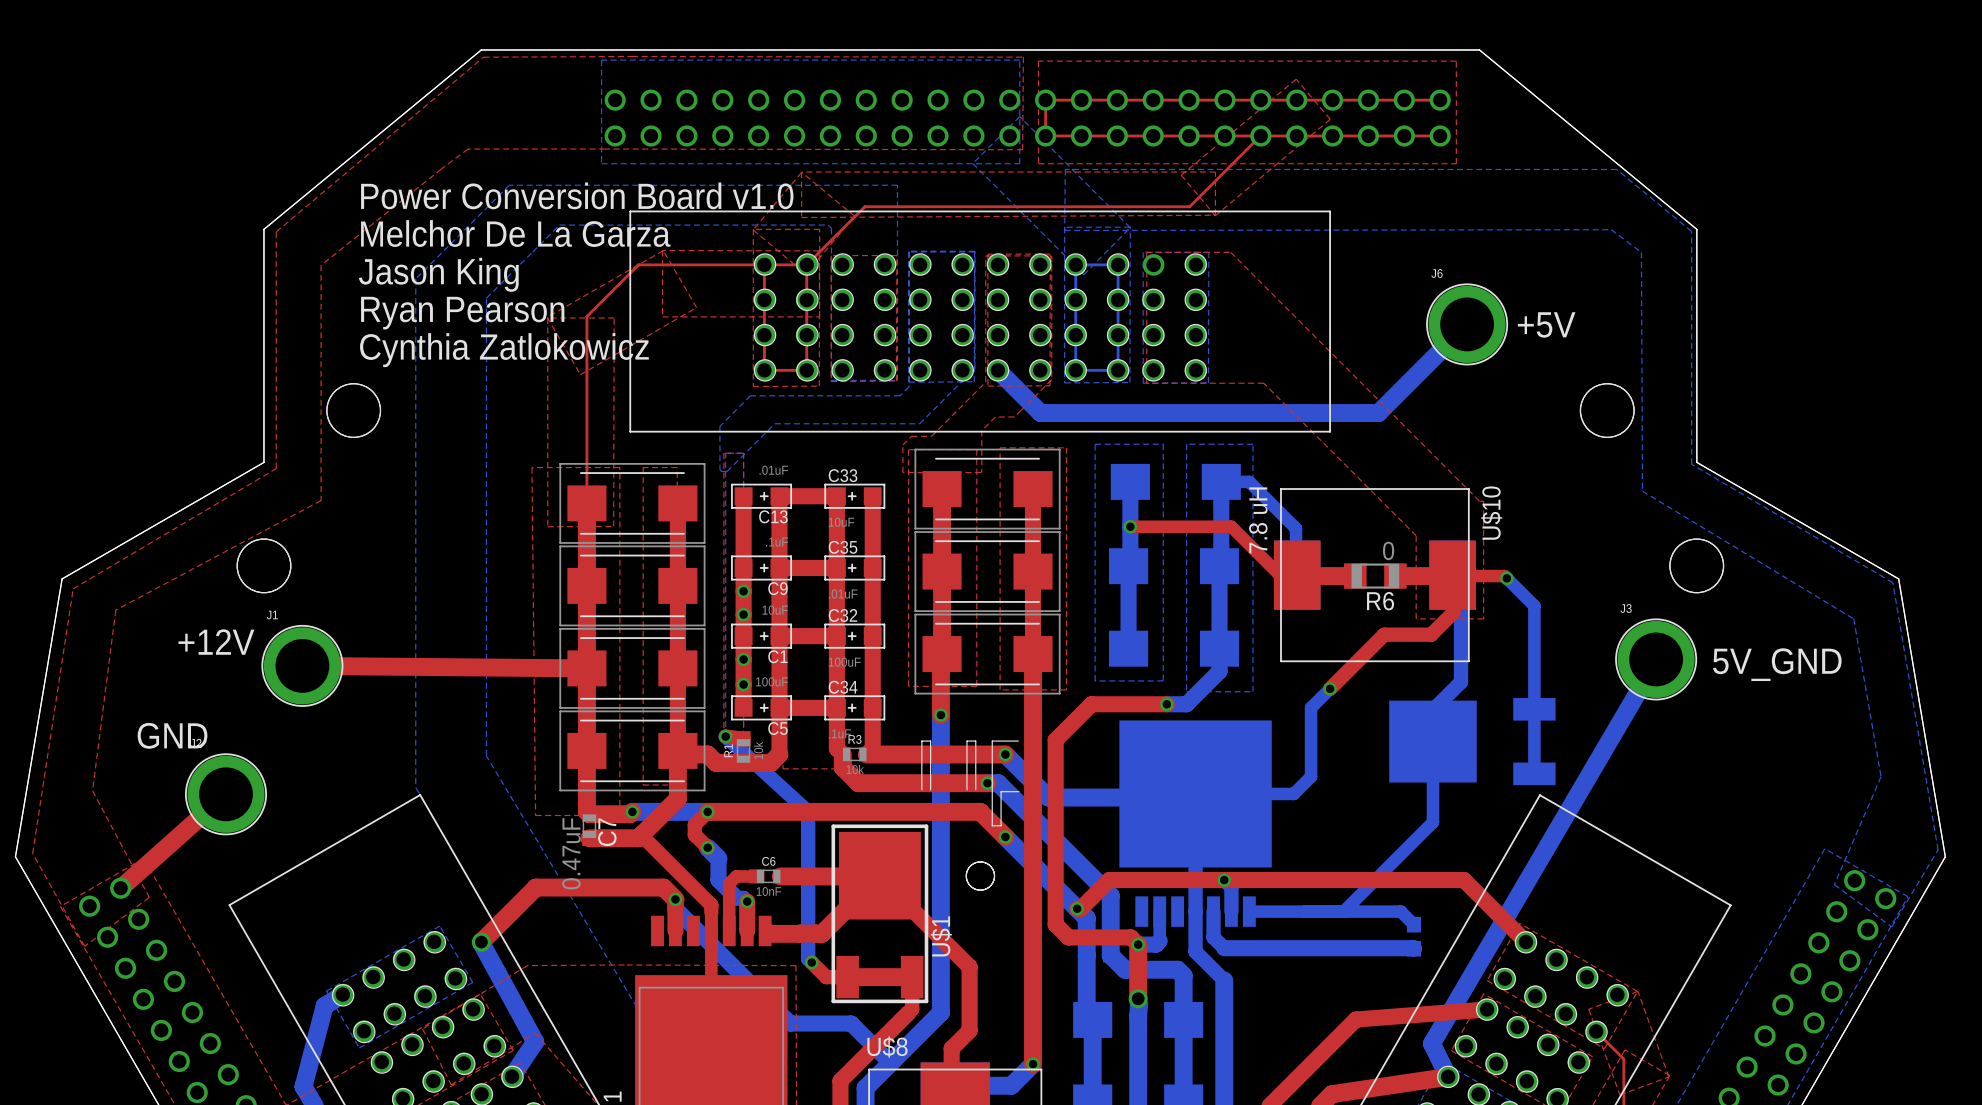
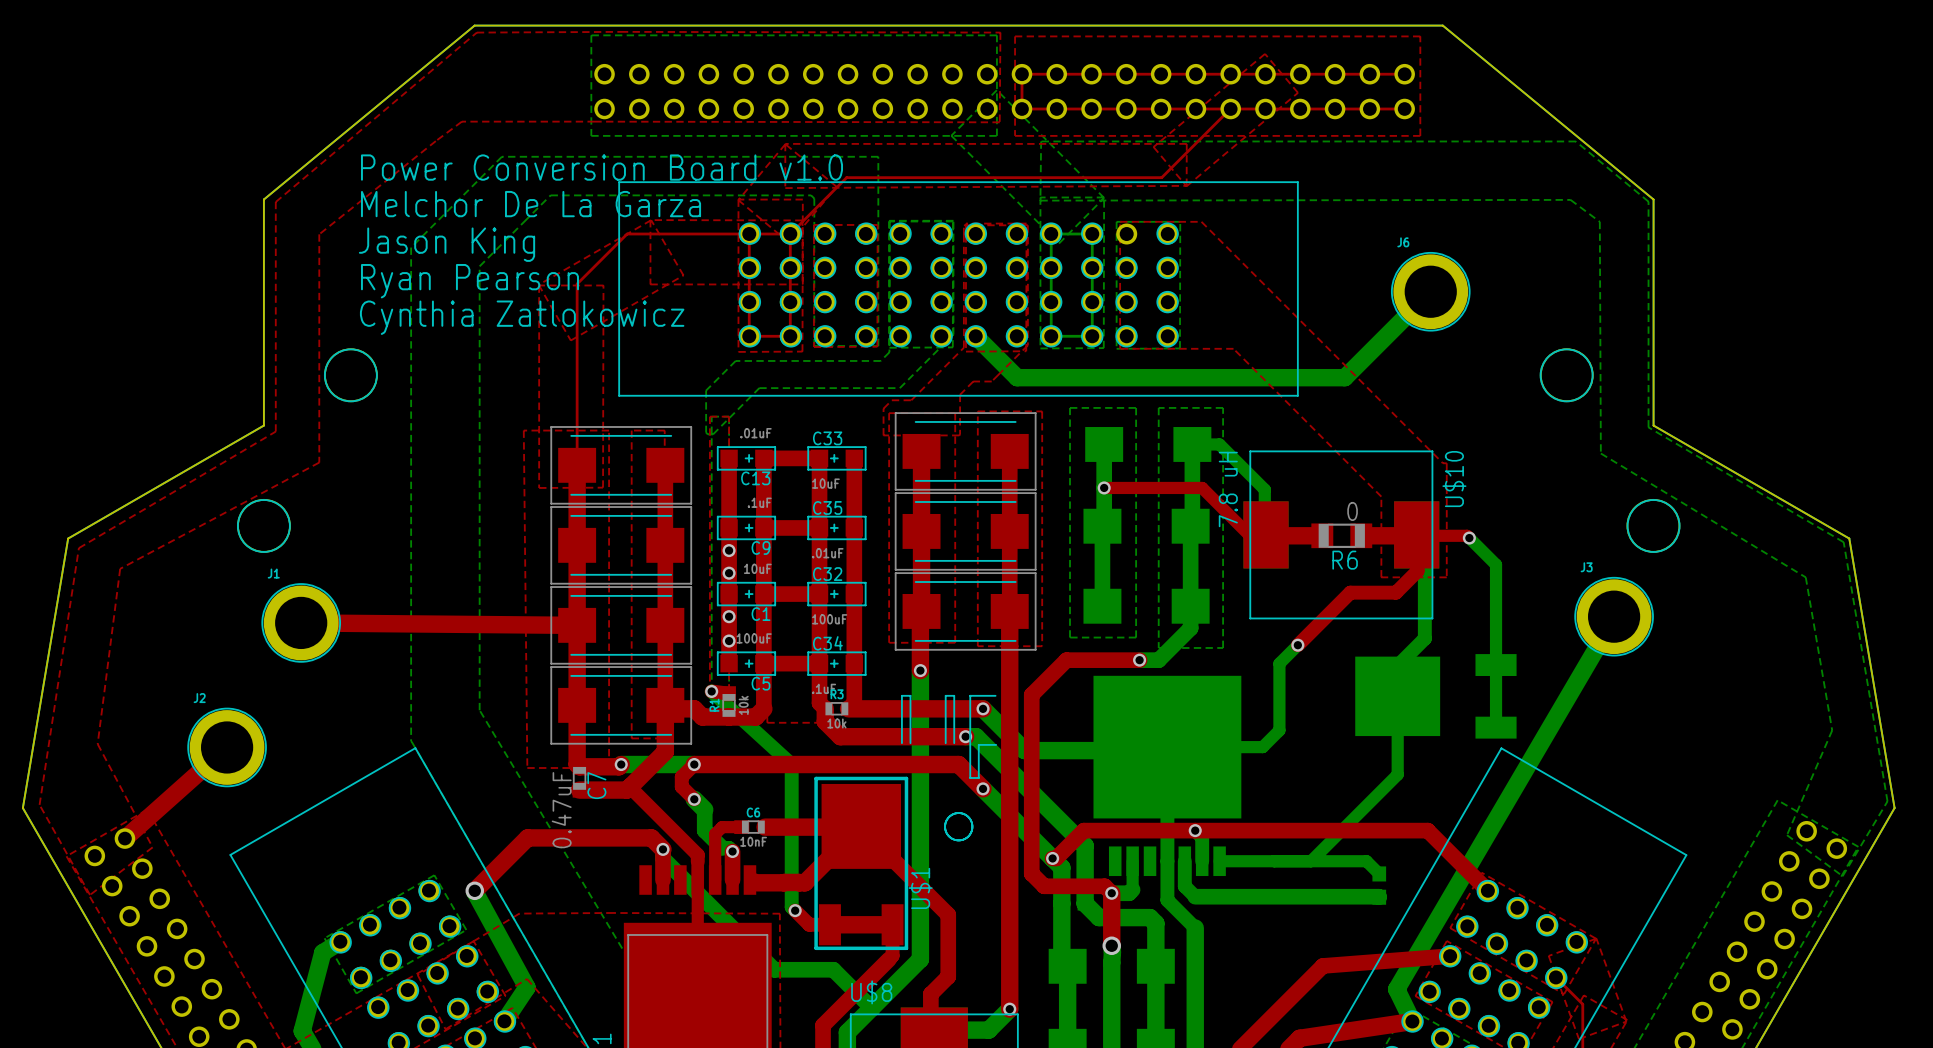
text: +5V (1546, 324) -> none
text: +12V (216, 642) -> none
text: 5V_GND (1777, 664) -> none
text: GND (172, 735) -> none

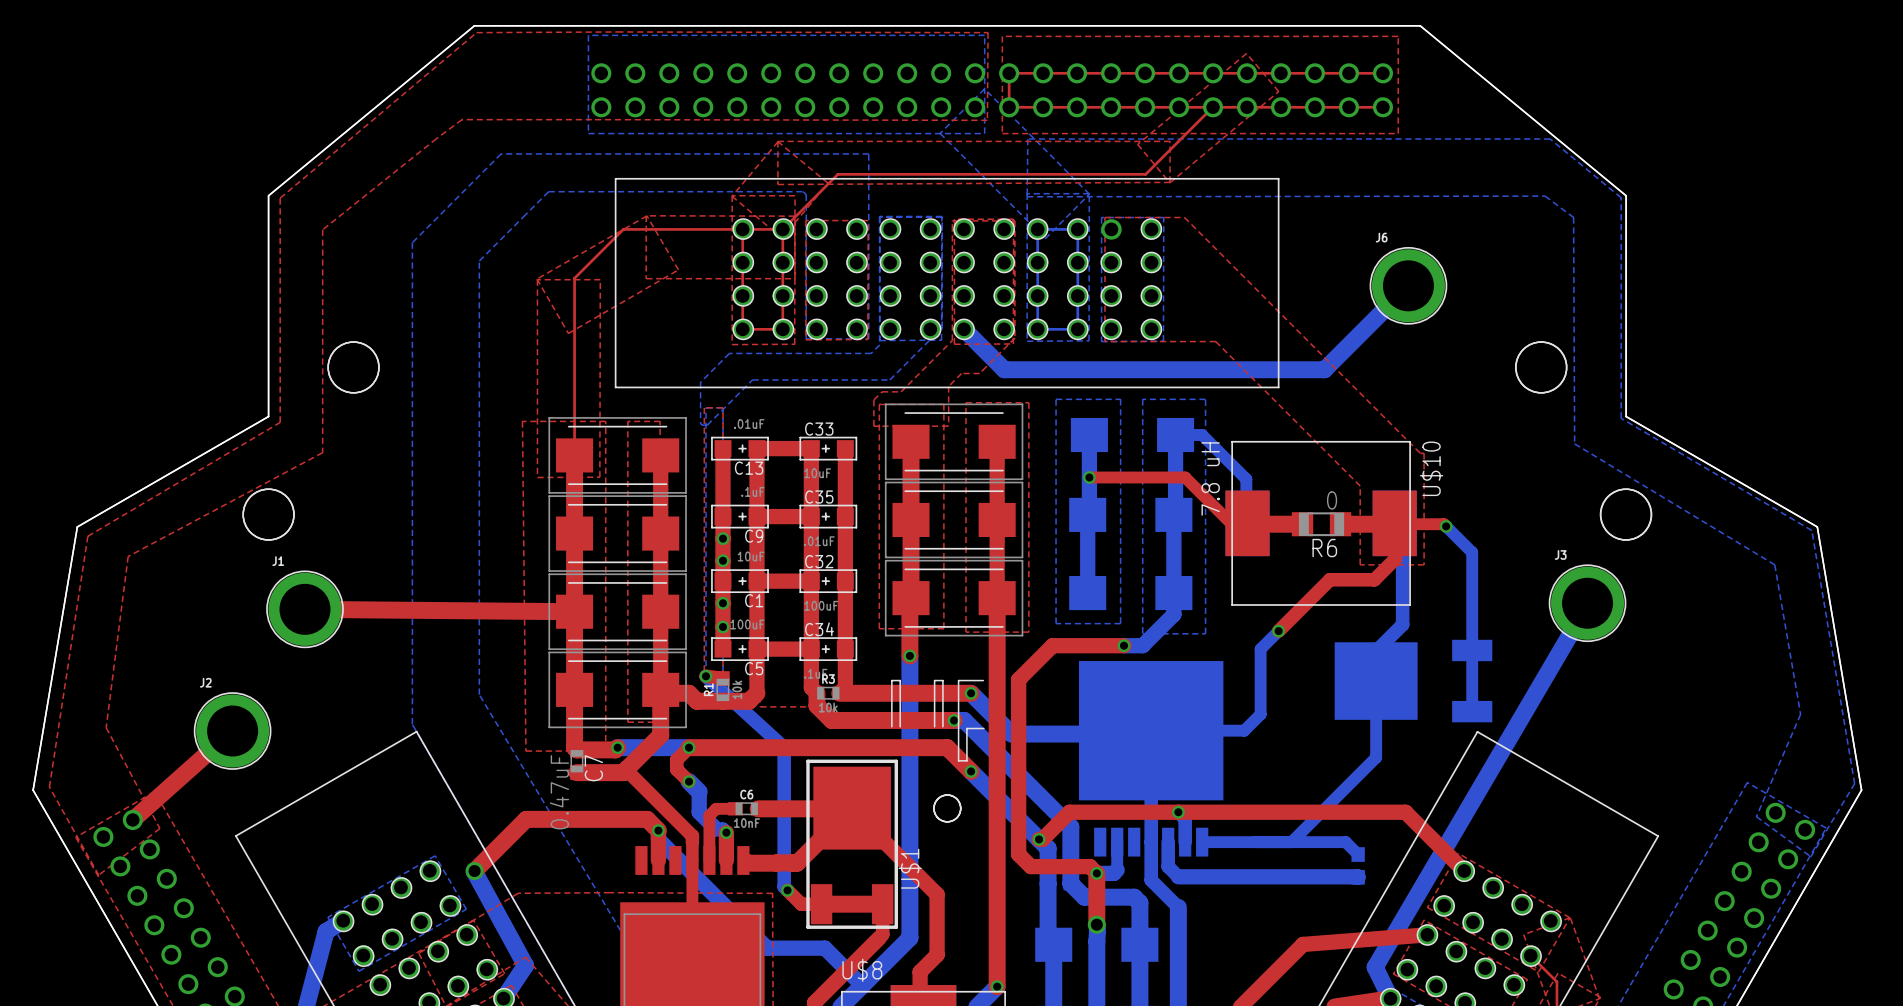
text: Power Conversion Board v1.0 (601, 167) -> none
text: Melchor De La Garza (531, 204) -> none
text: Jason King (447, 244) -> none
text: Ryan Pearson (469, 281) -> none
text: Cynthia Zatlokowicz (522, 317) -> none

